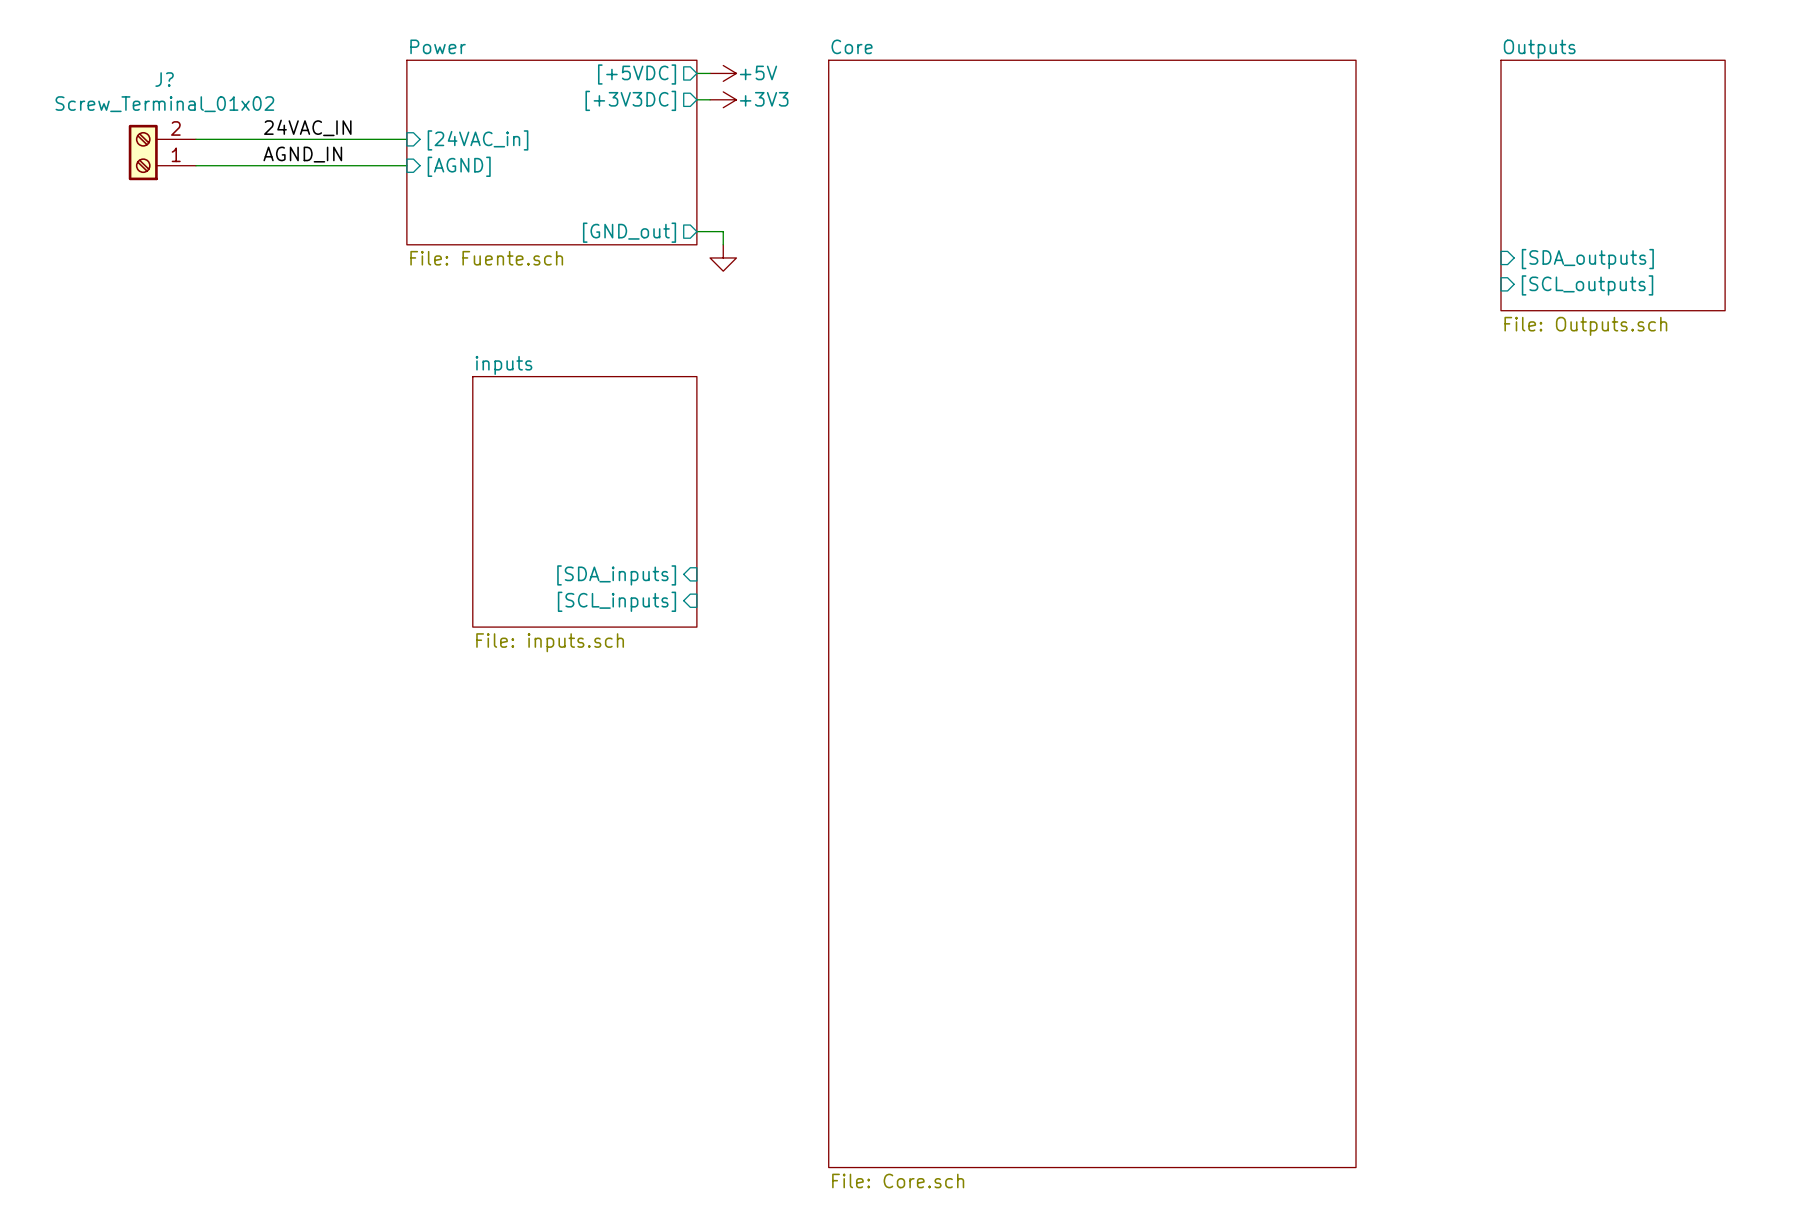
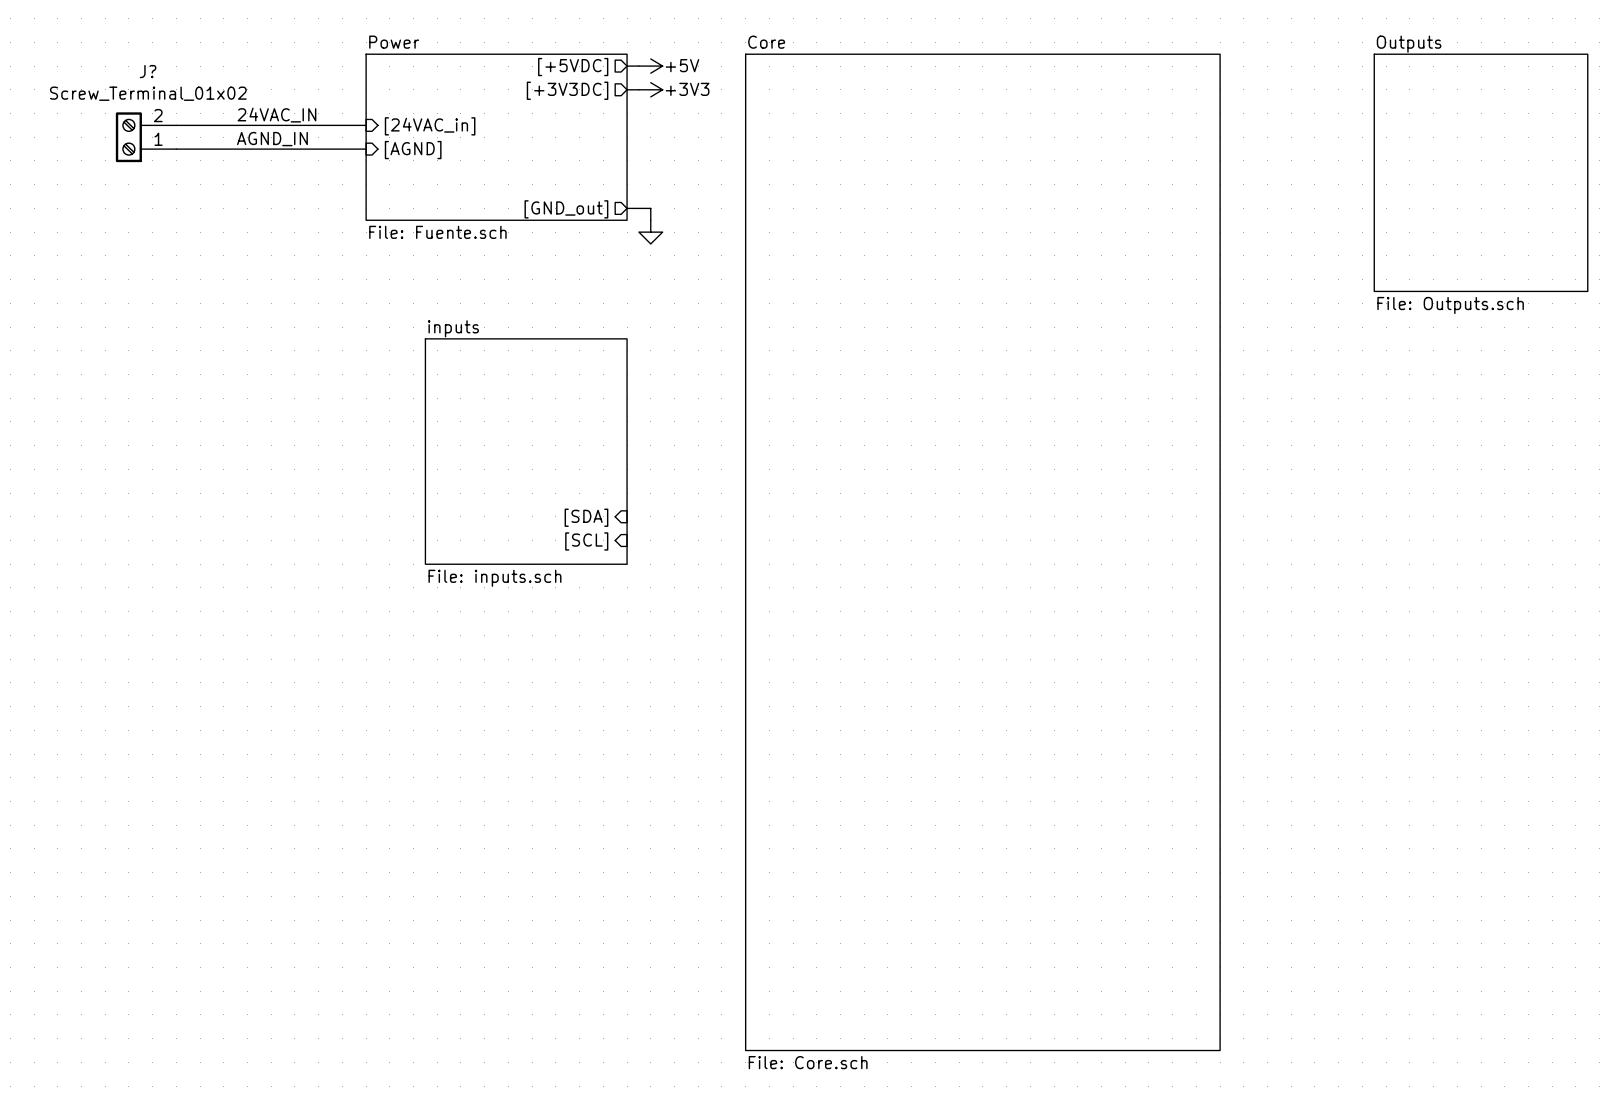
sheet Outputs: File: Outputs.sch (1613, 185) -> none
sheet Outputs: none -> File: Outputs.sch (1481, 172)
sheet pin: [SDA_outputs] (1587, 259) -> none
sheet pin: [SCL_outputs] (1587, 285) -> none
sheet pin: [SDA_inputs] (616, 575) -> [SDA] (586, 517)
sheet pin: [SCL_inputs] (616, 601) -> [SCL] (586, 541)

